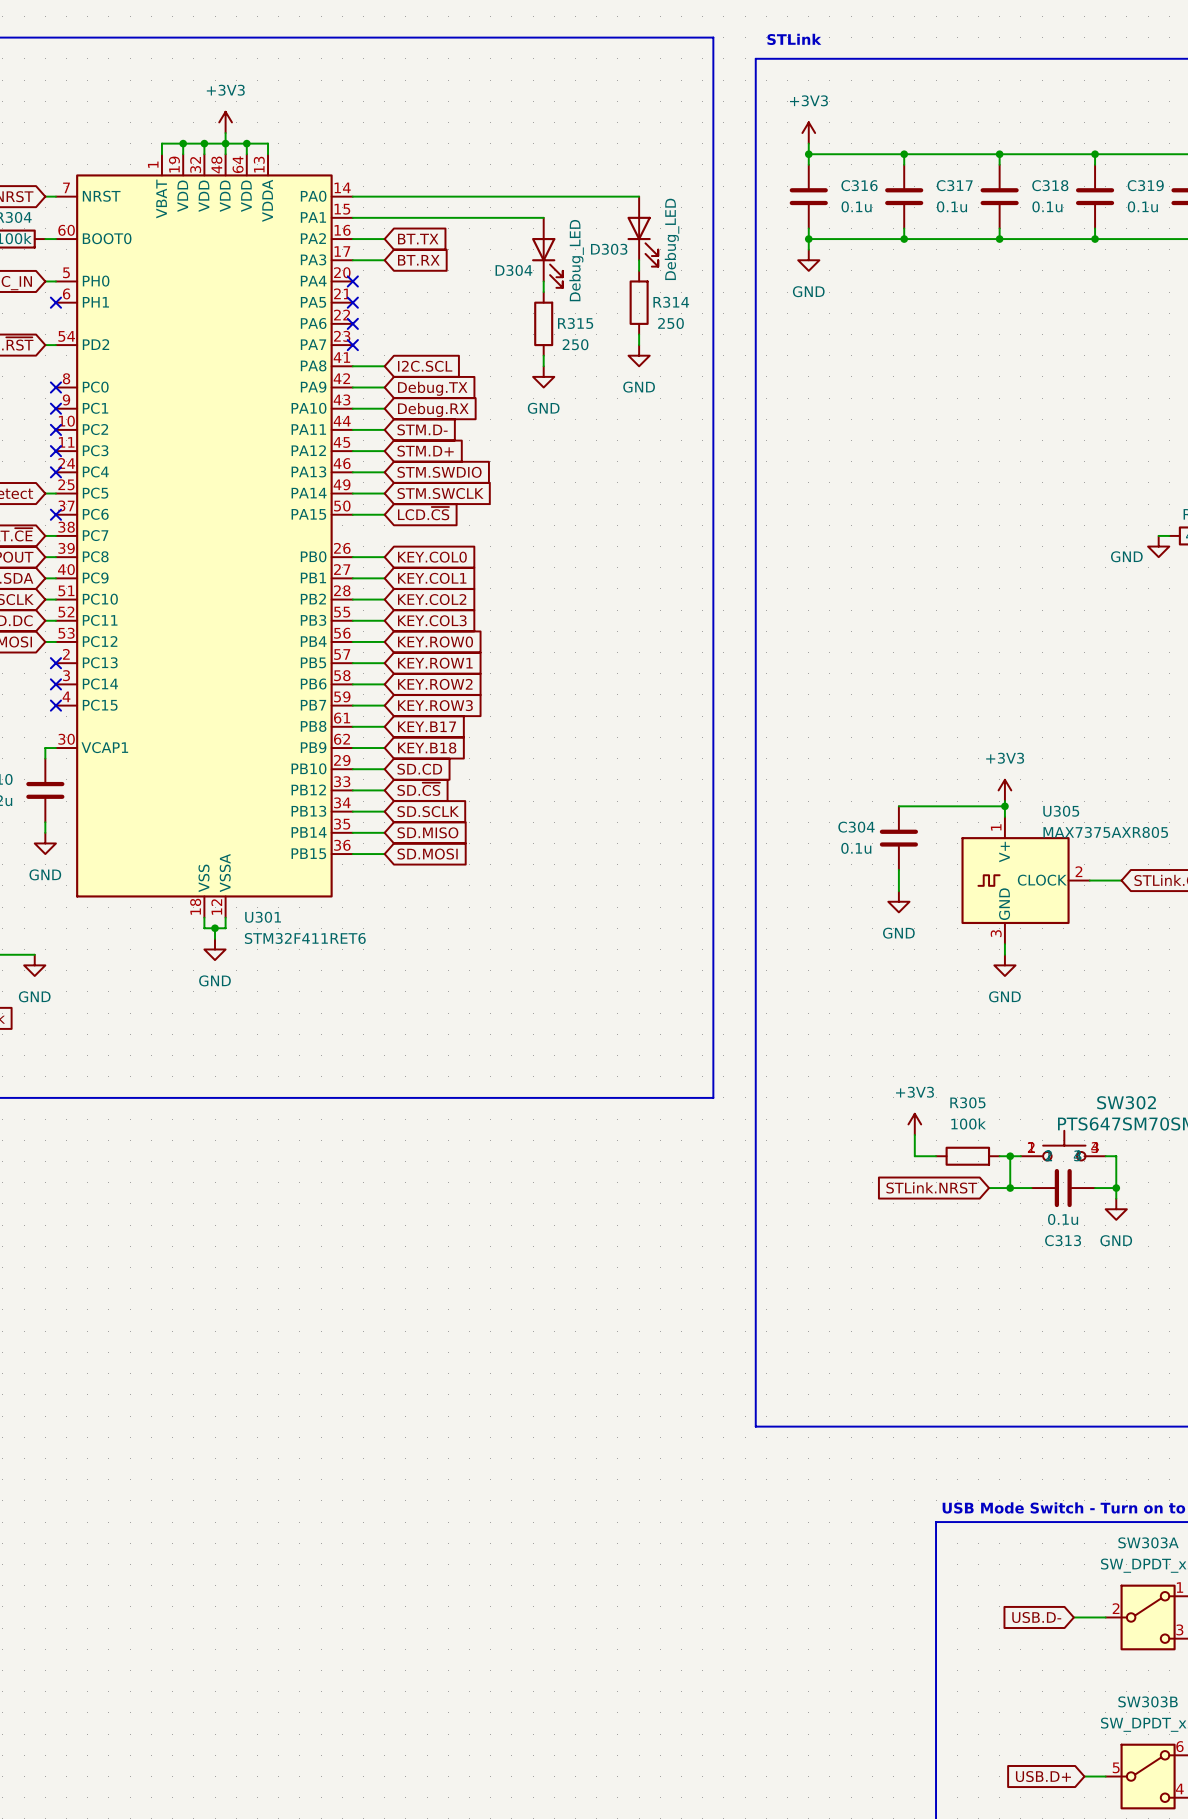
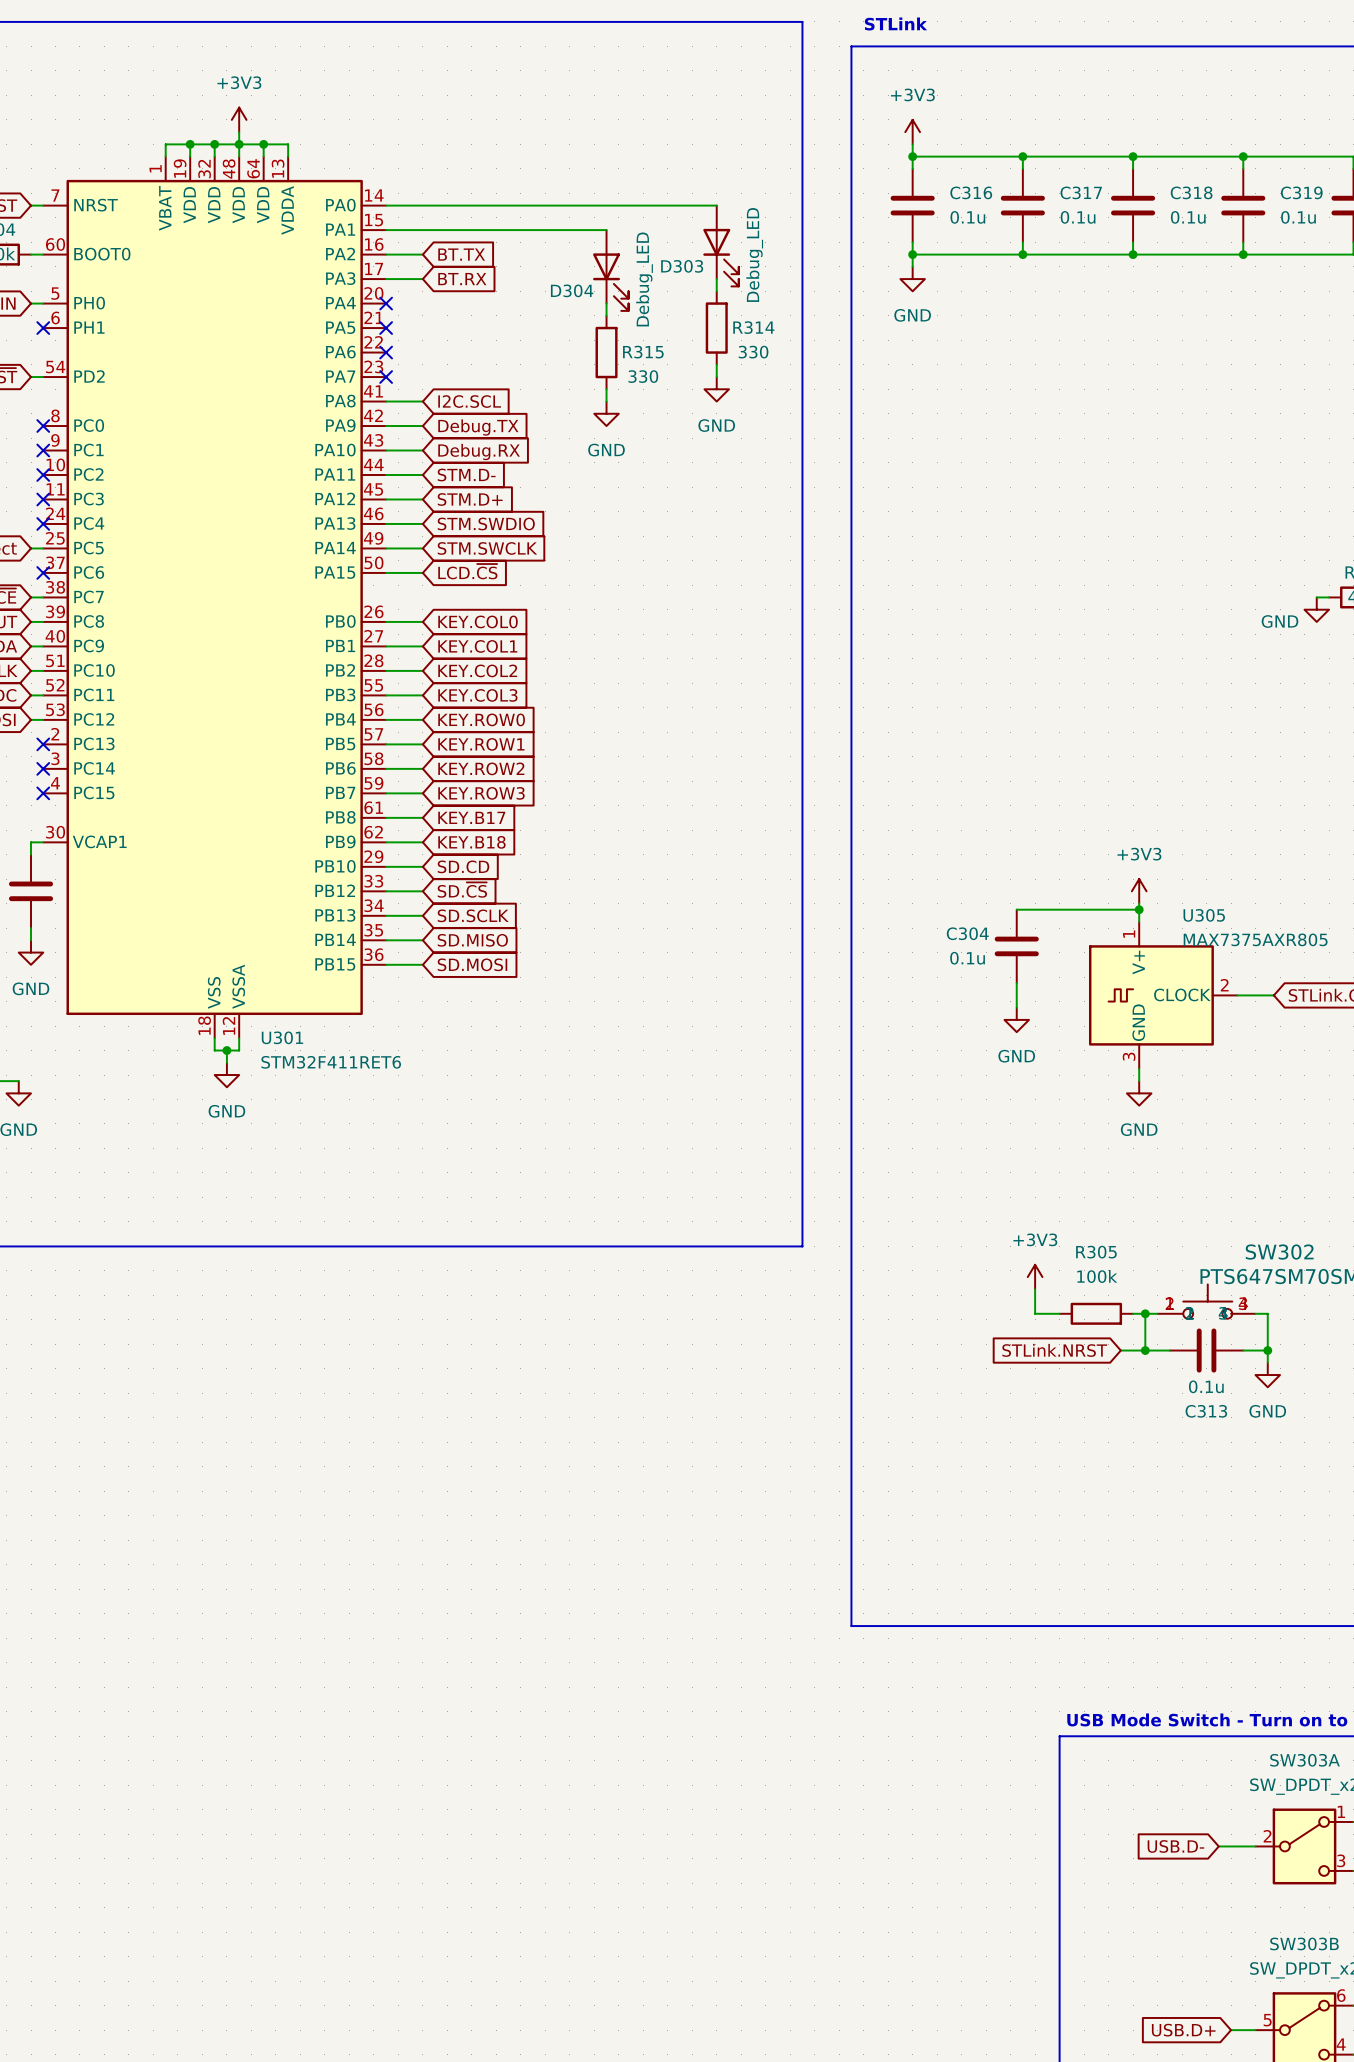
R314 value: 250 (670, 323) -> 330 (753, 352)
R315 value: 250 (575, 344) -> 330 (643, 376)

